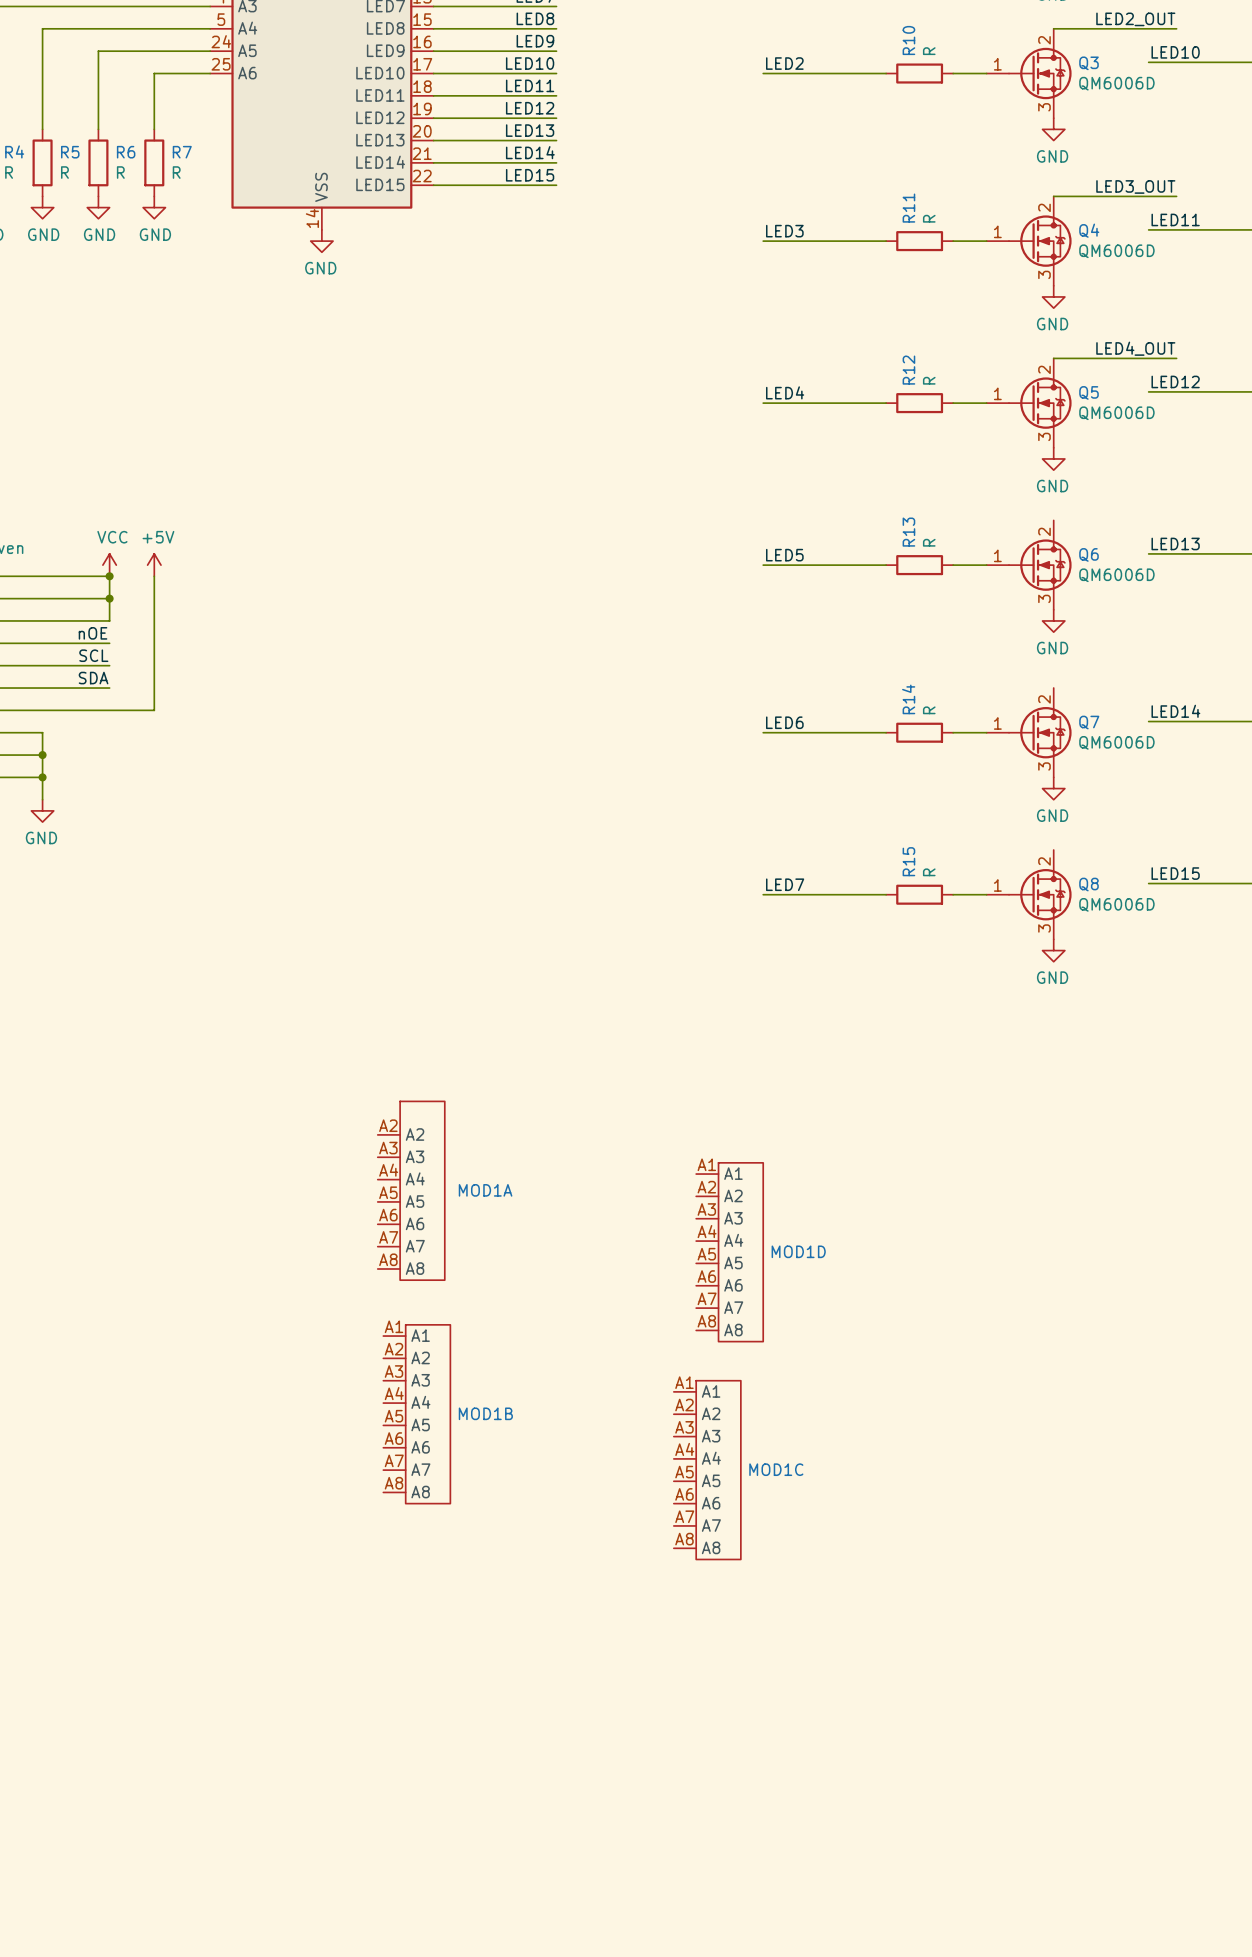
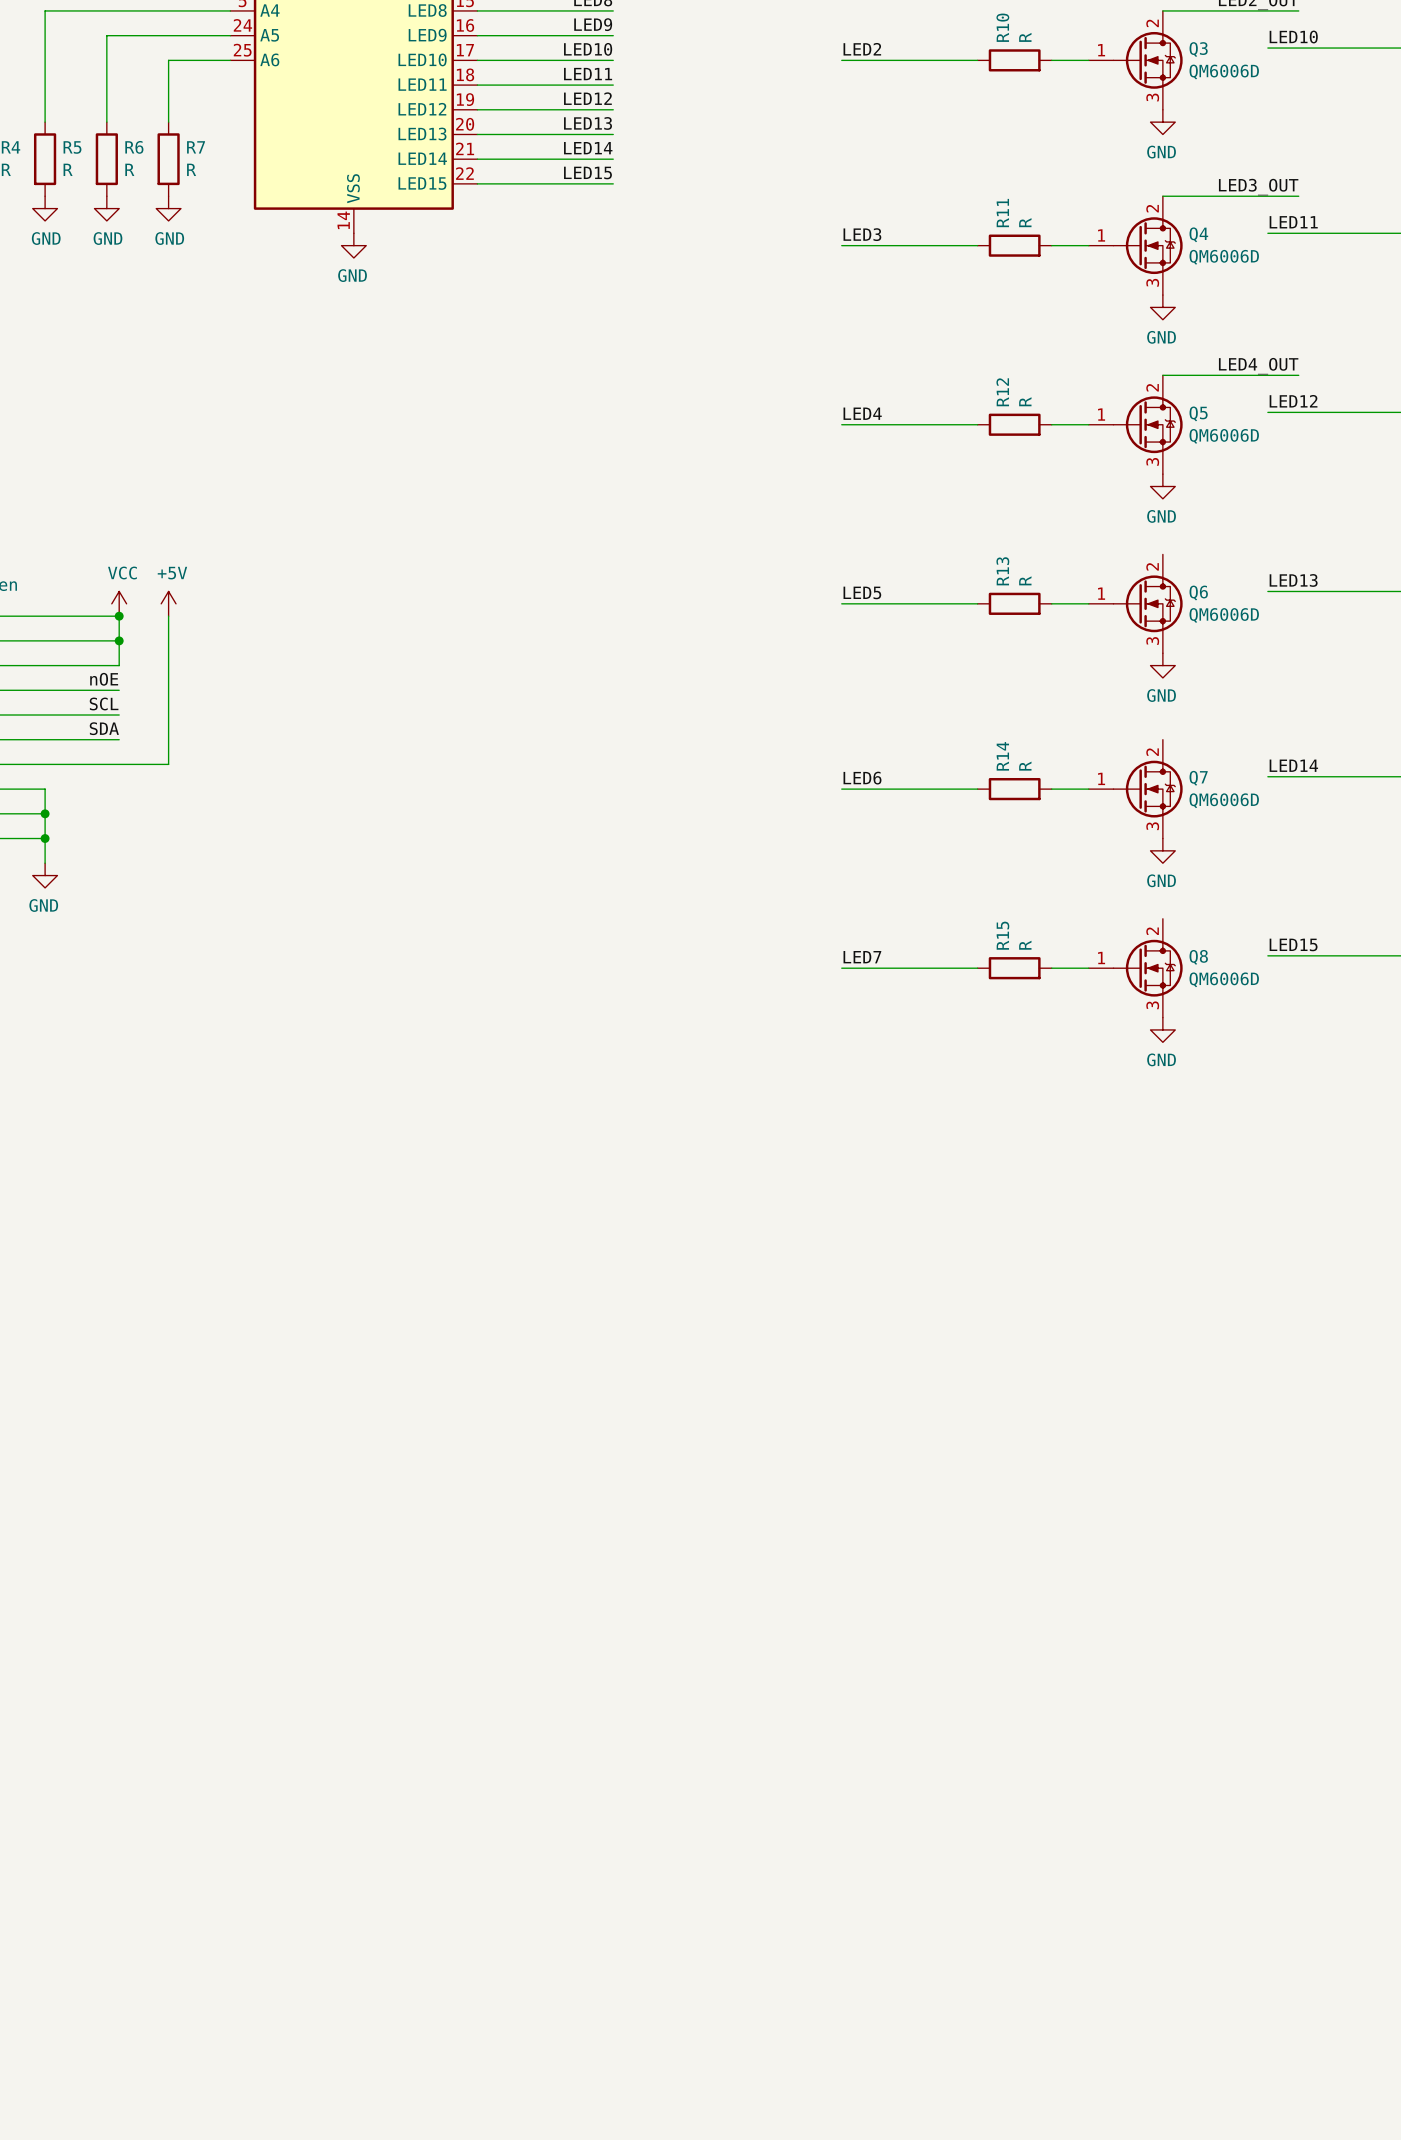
MOD1A: (411, 1190) -> none
MOD1D: (729, 1252) -> none
MOD1B: (416, 1414) -> none
MOD1C: (707, 1470) -> none

